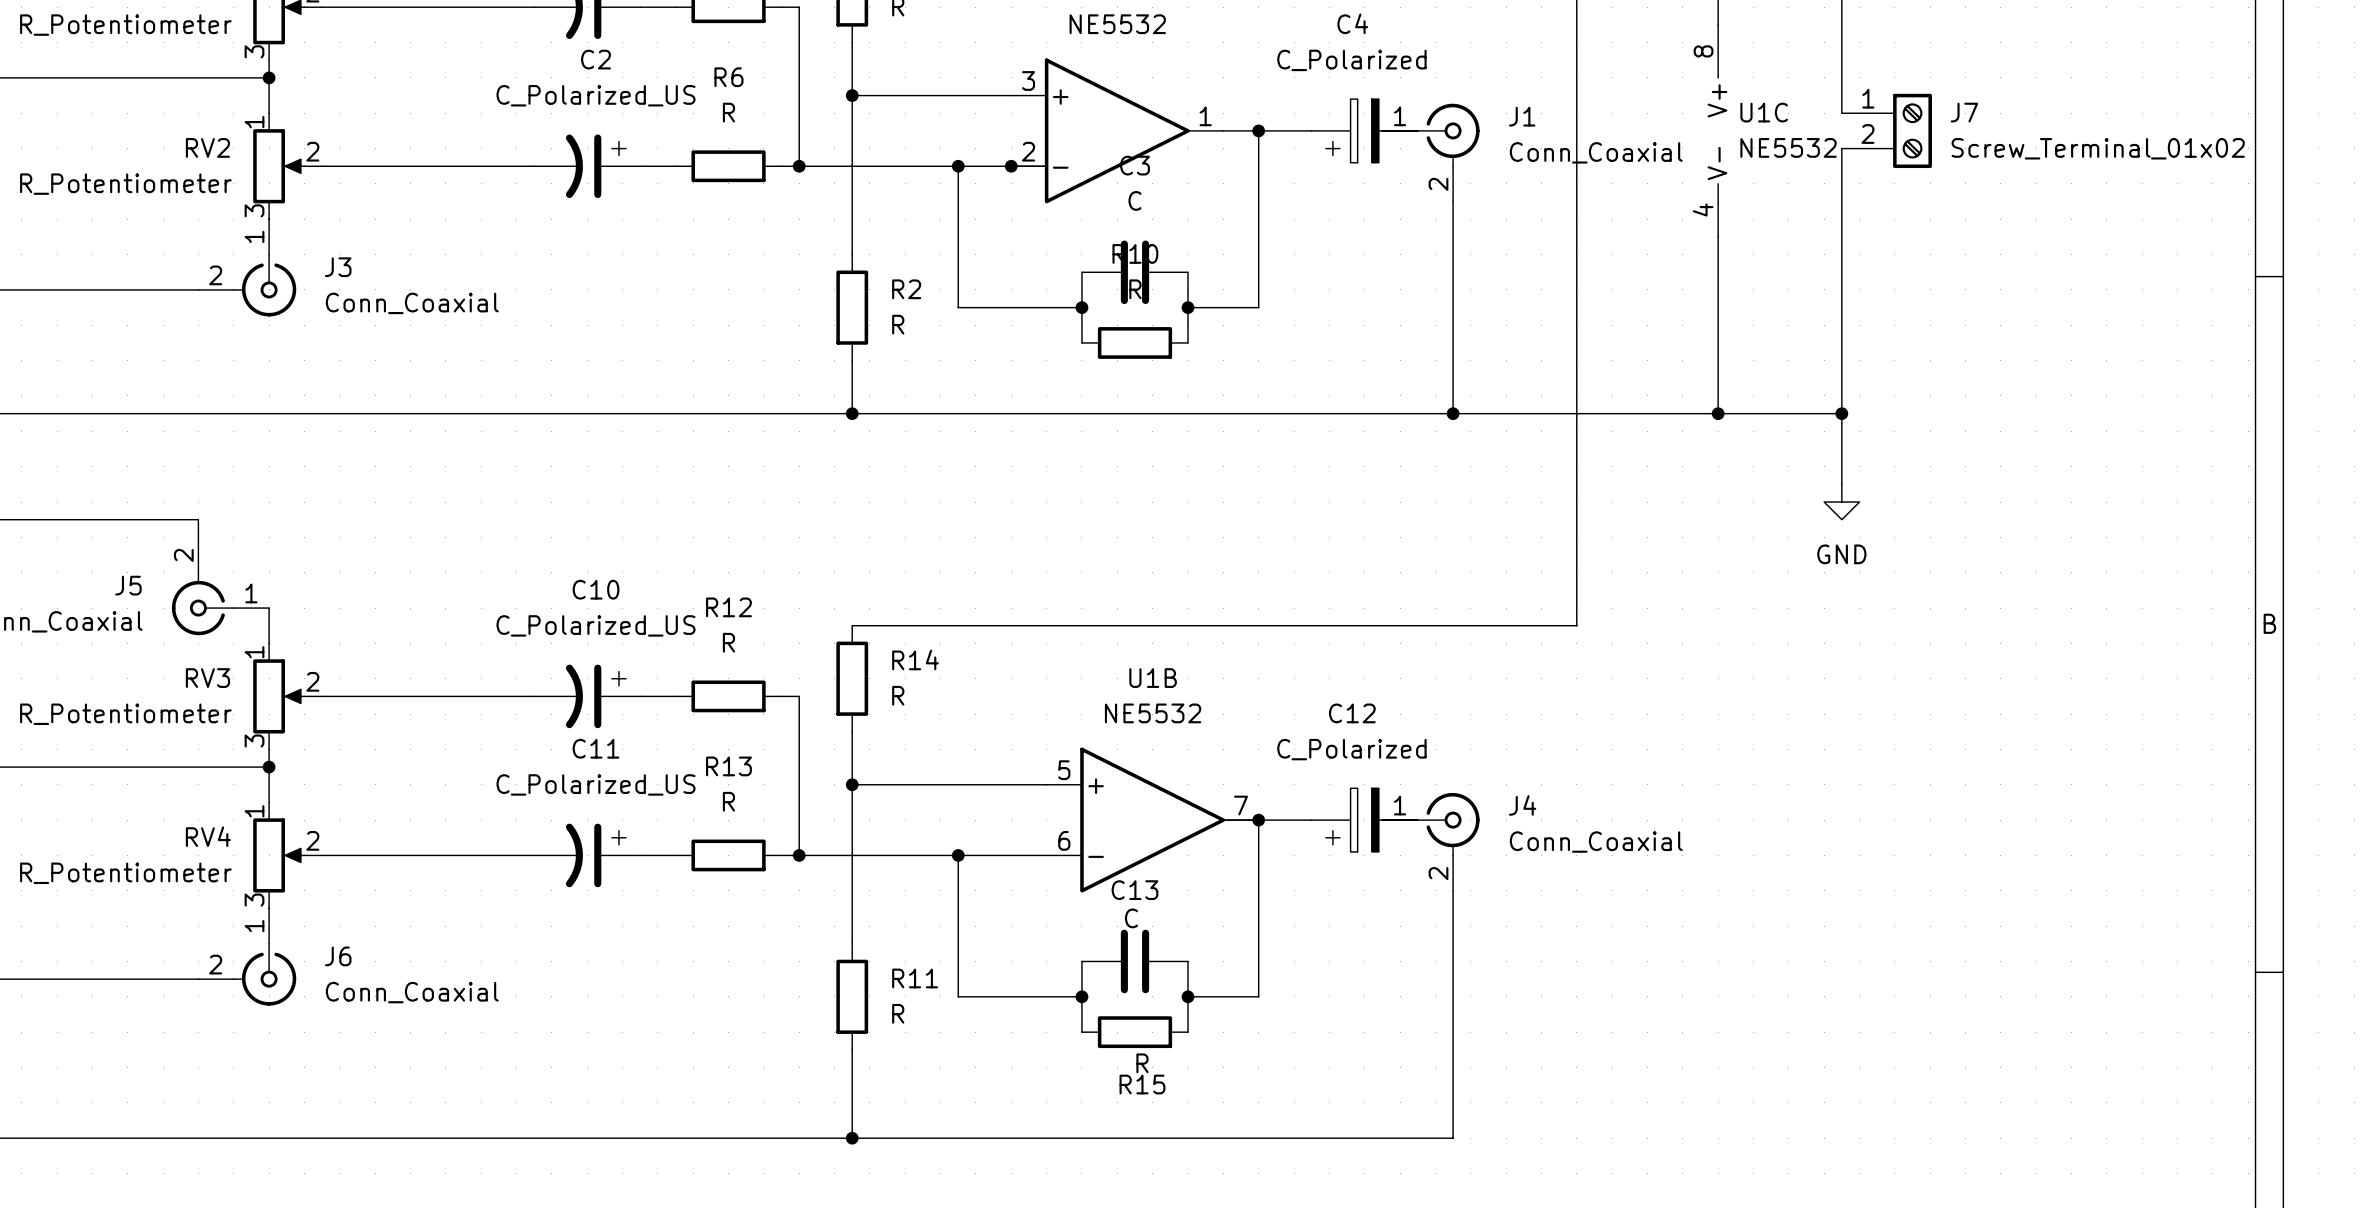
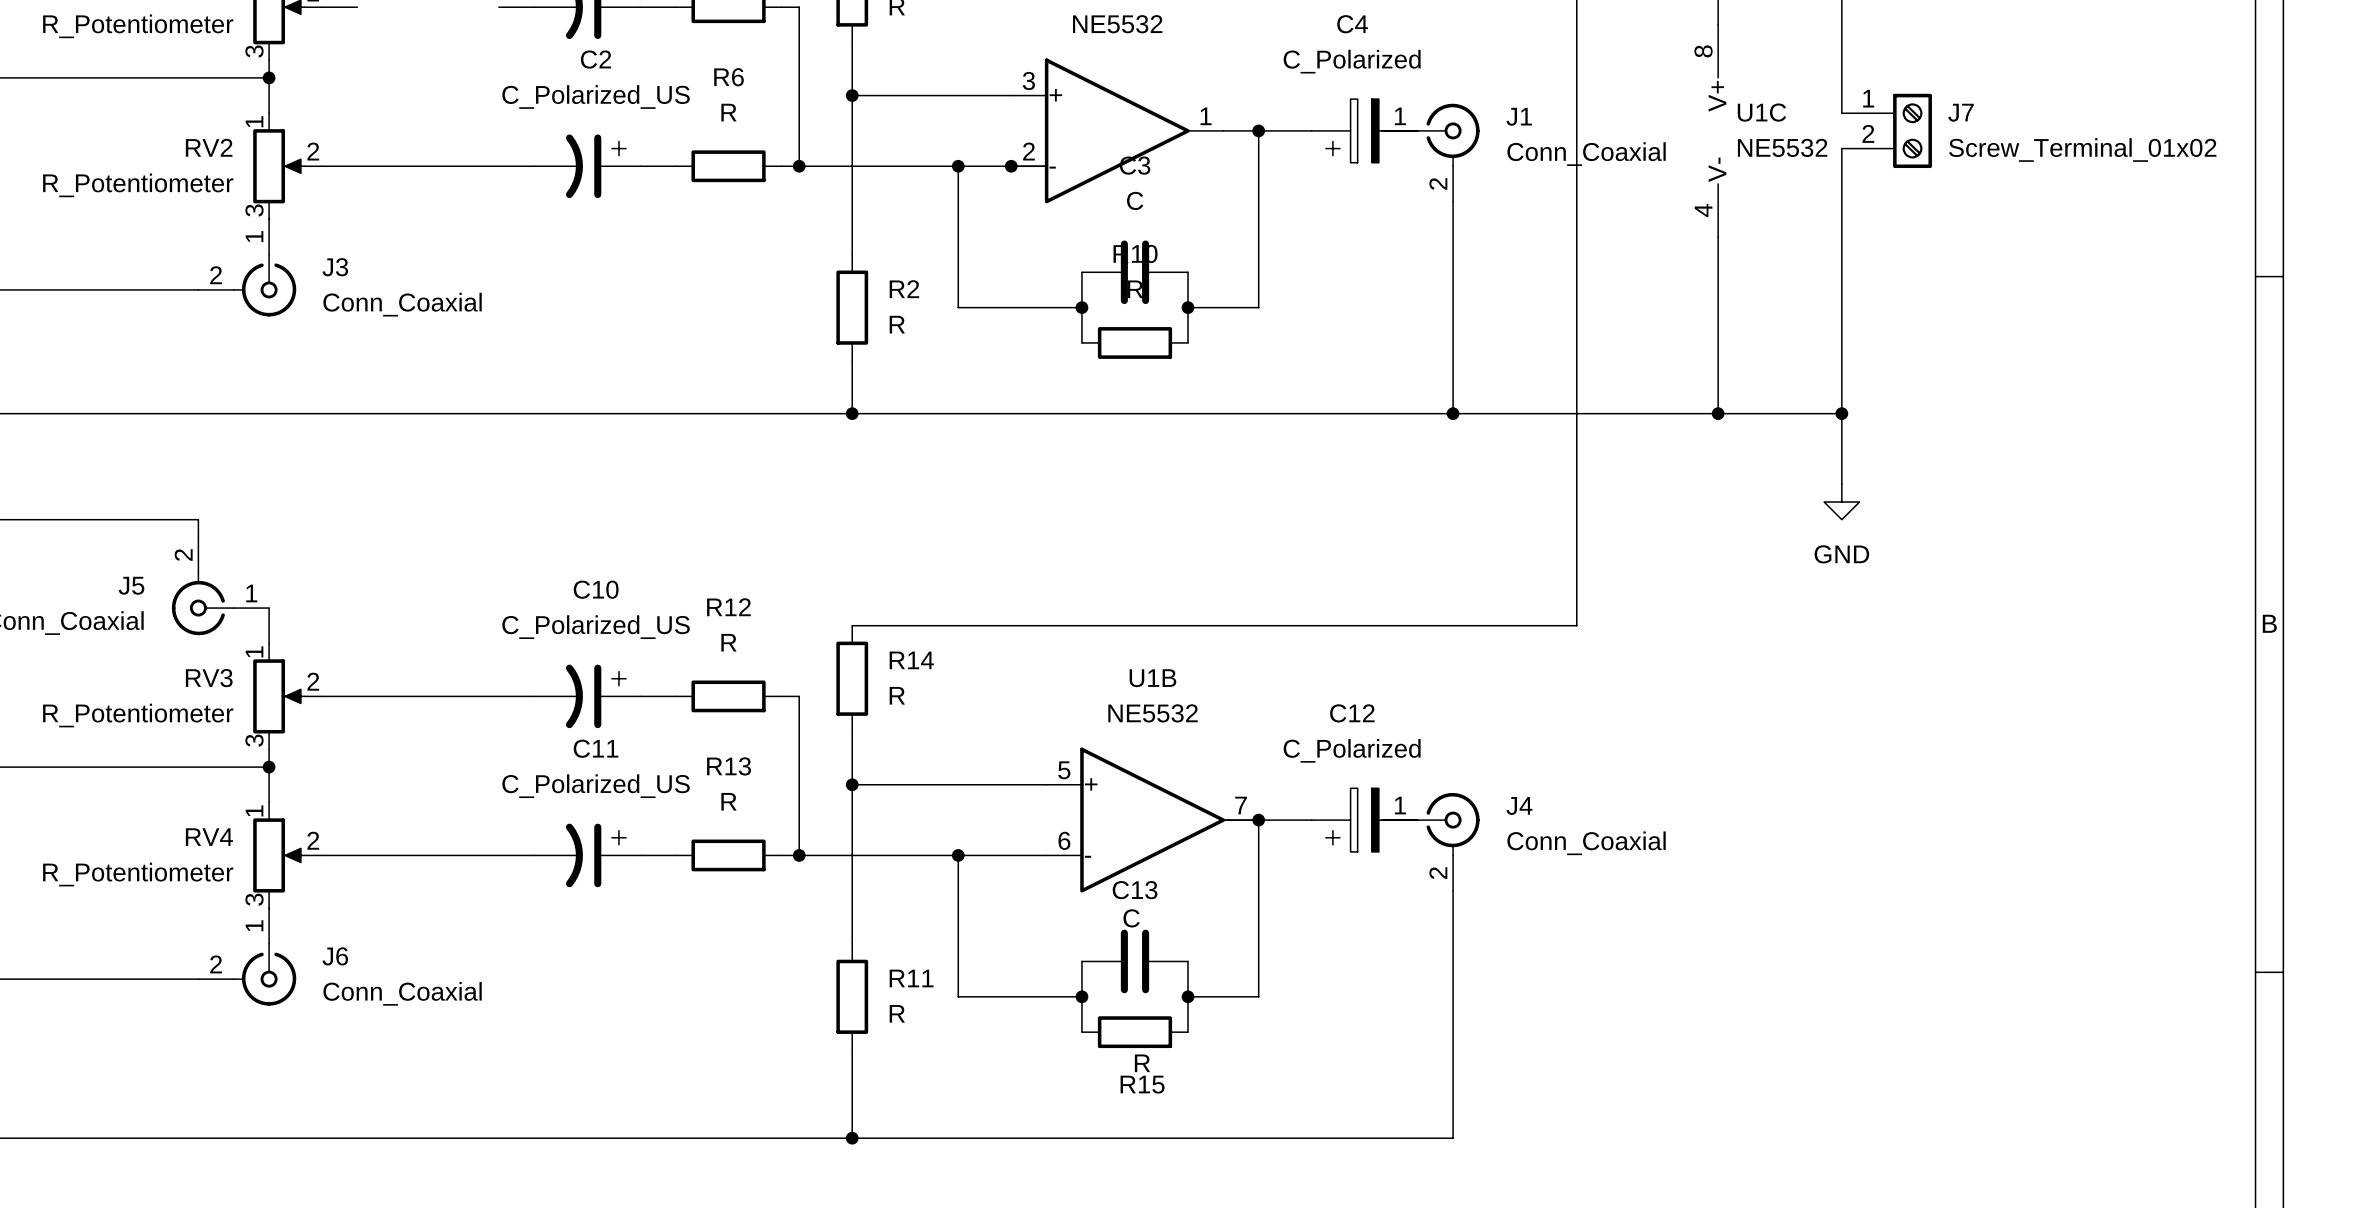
wire: (357, 7) (498, 7) -> none

